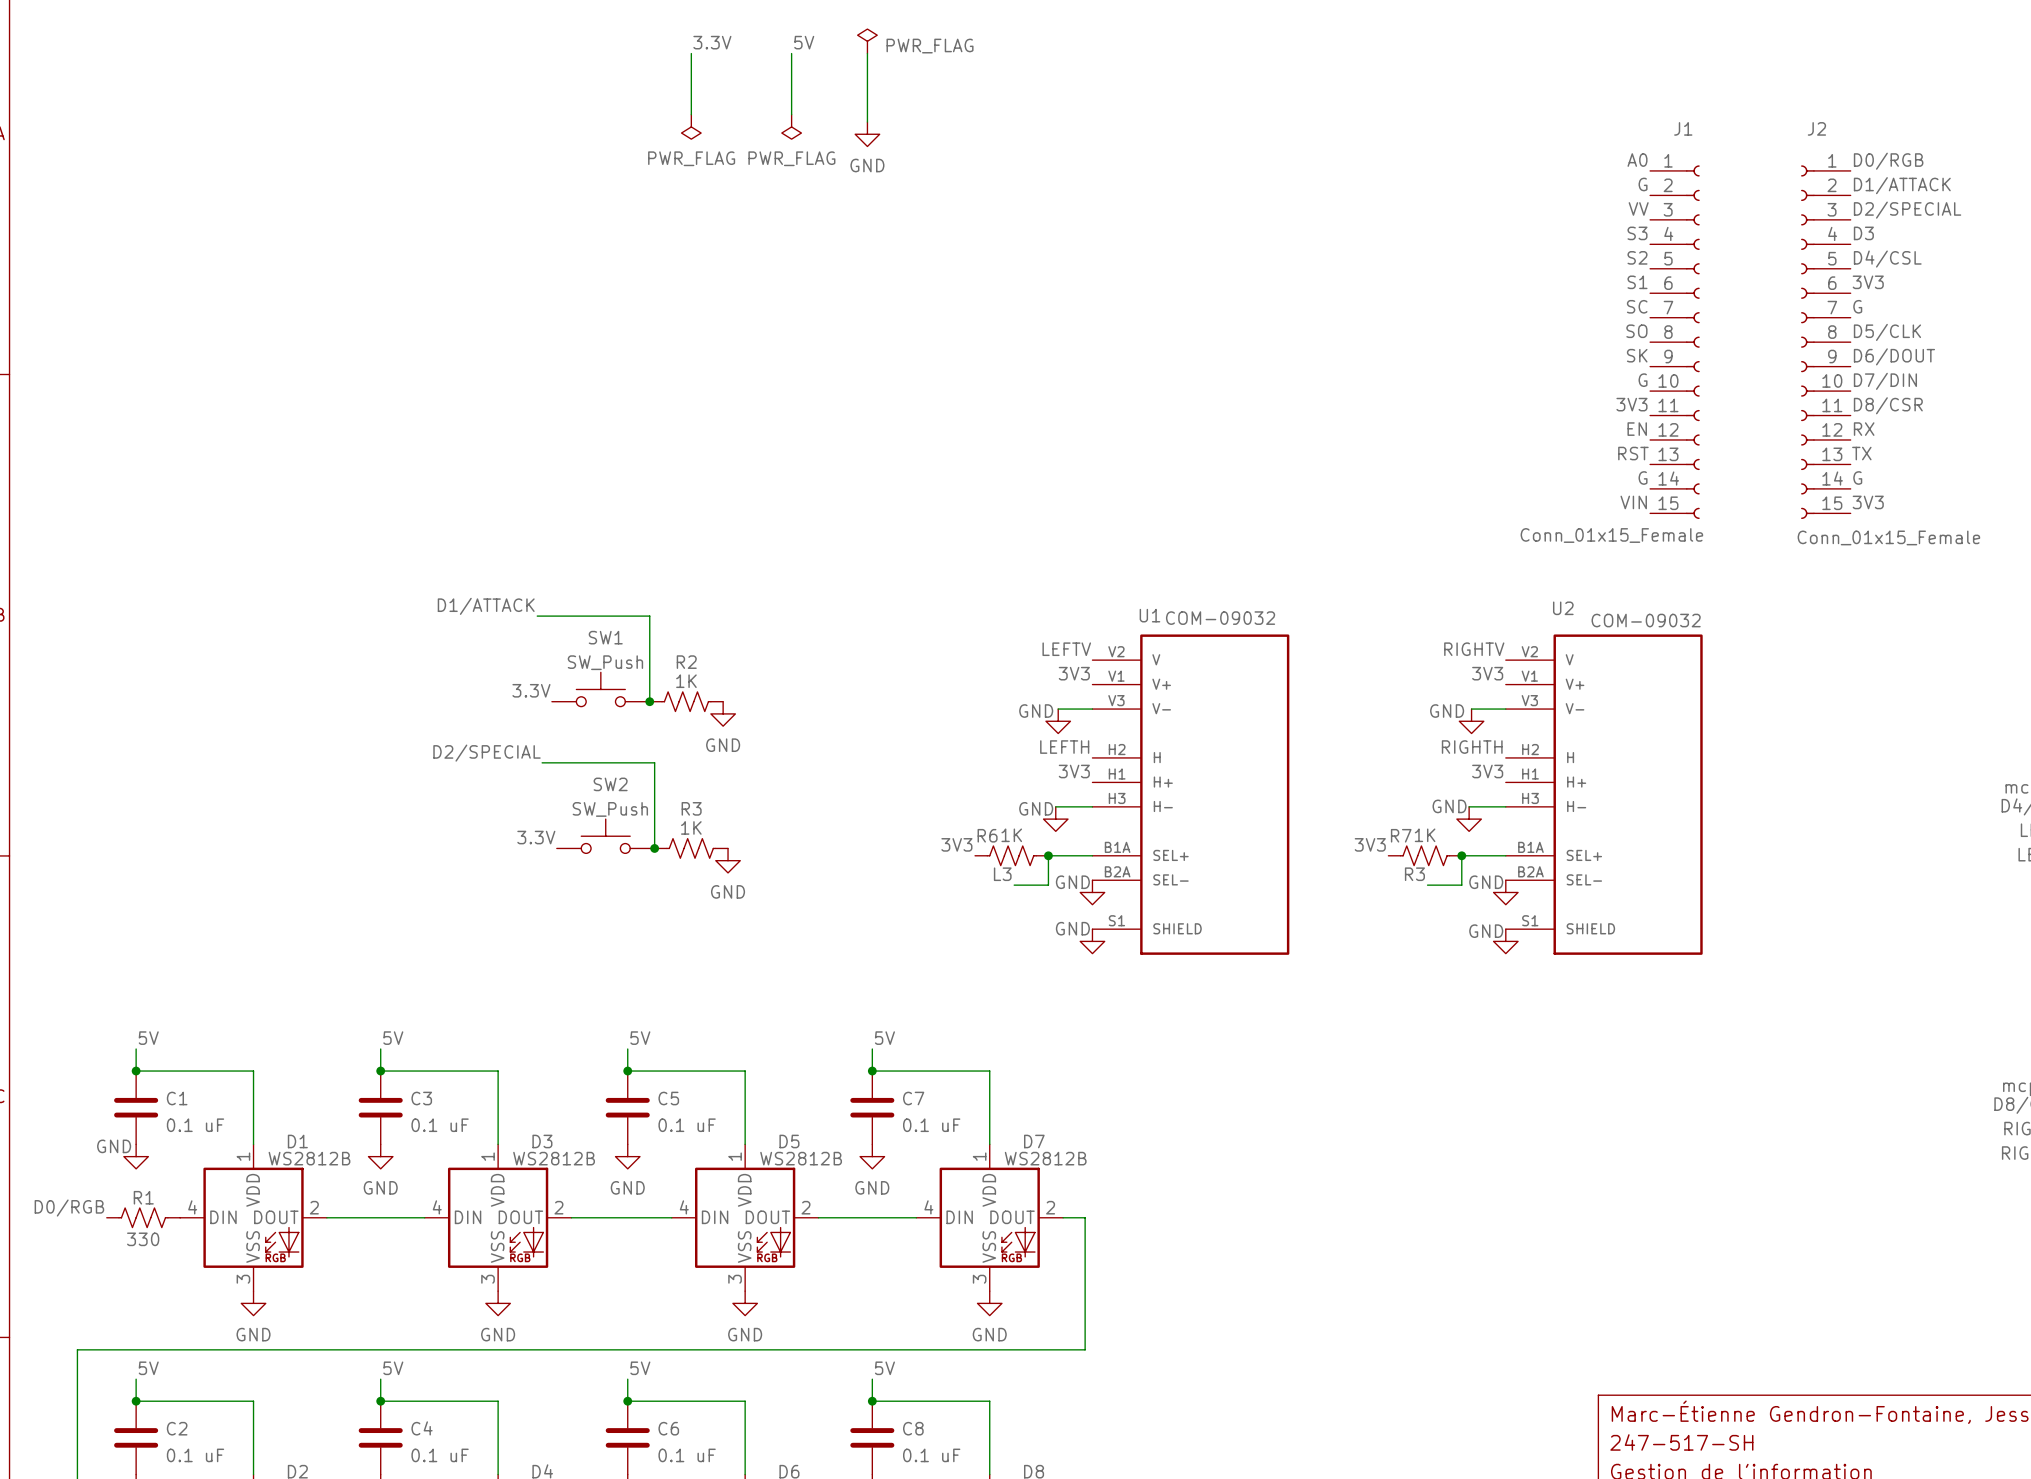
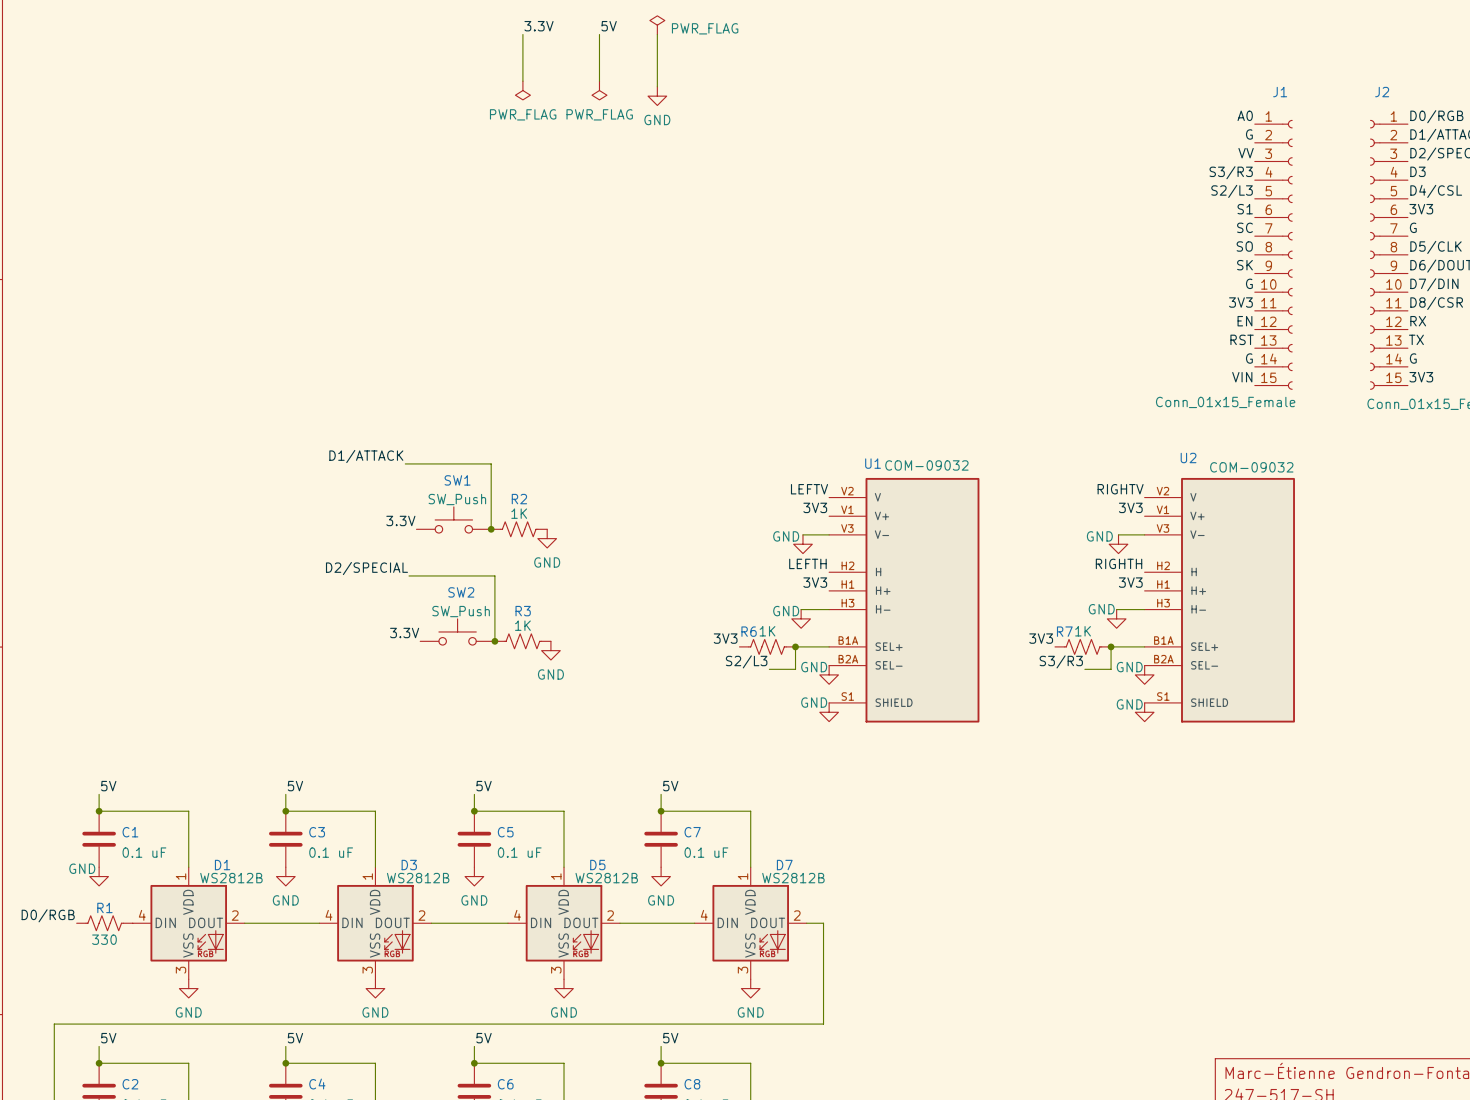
label: S3 (1637, 233) -> S3/R3 (1231, 172)
label: S2 (1637, 257) -> S2/L3 (1232, 191)
label: L3 (1002, 874) -> S2/L3 (746, 661)
label: R3 (1414, 874) -> S3/R3 (1061, 661)

